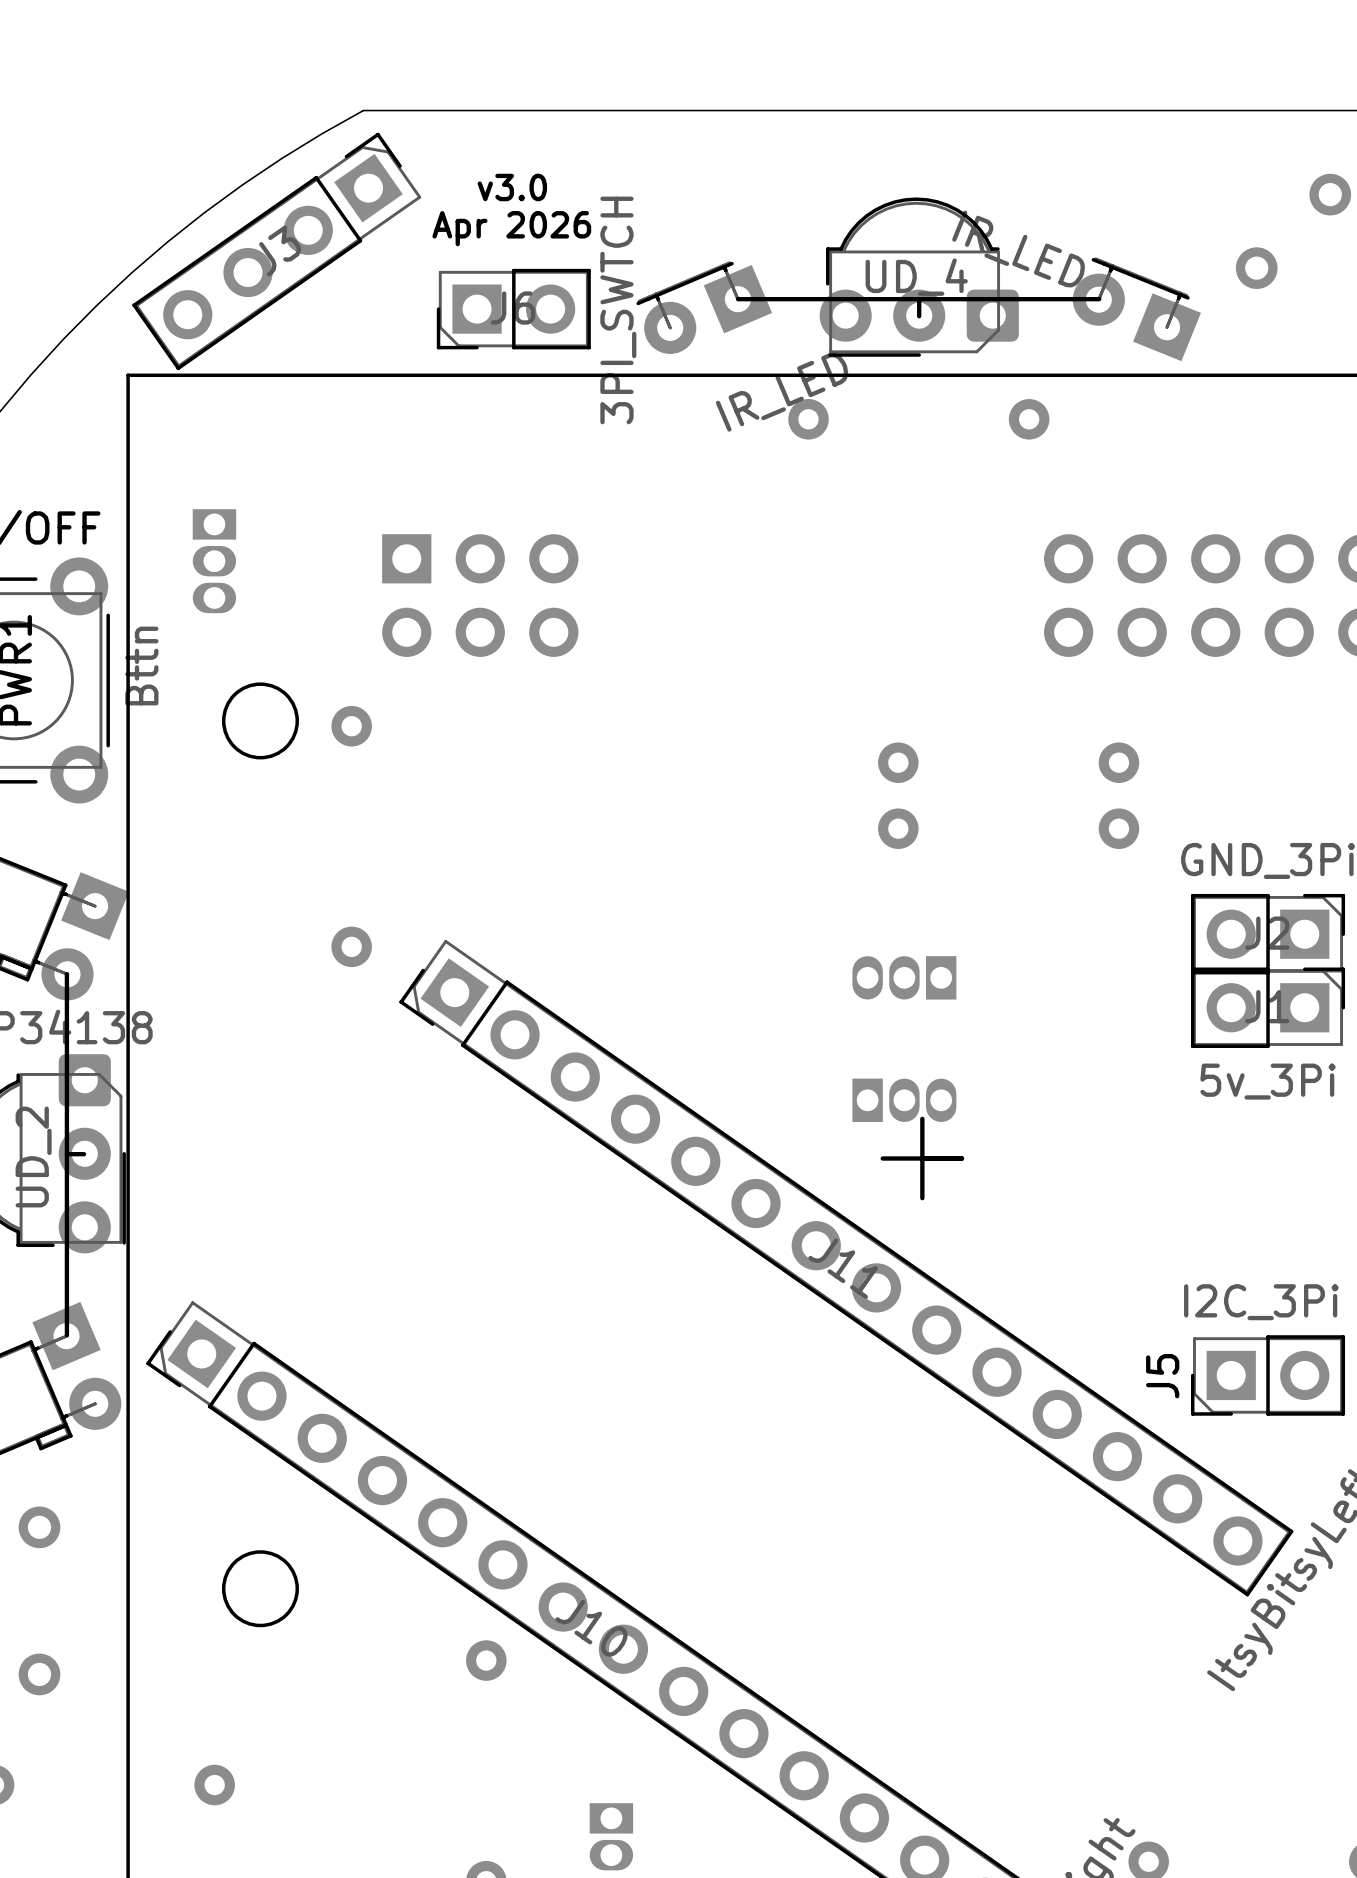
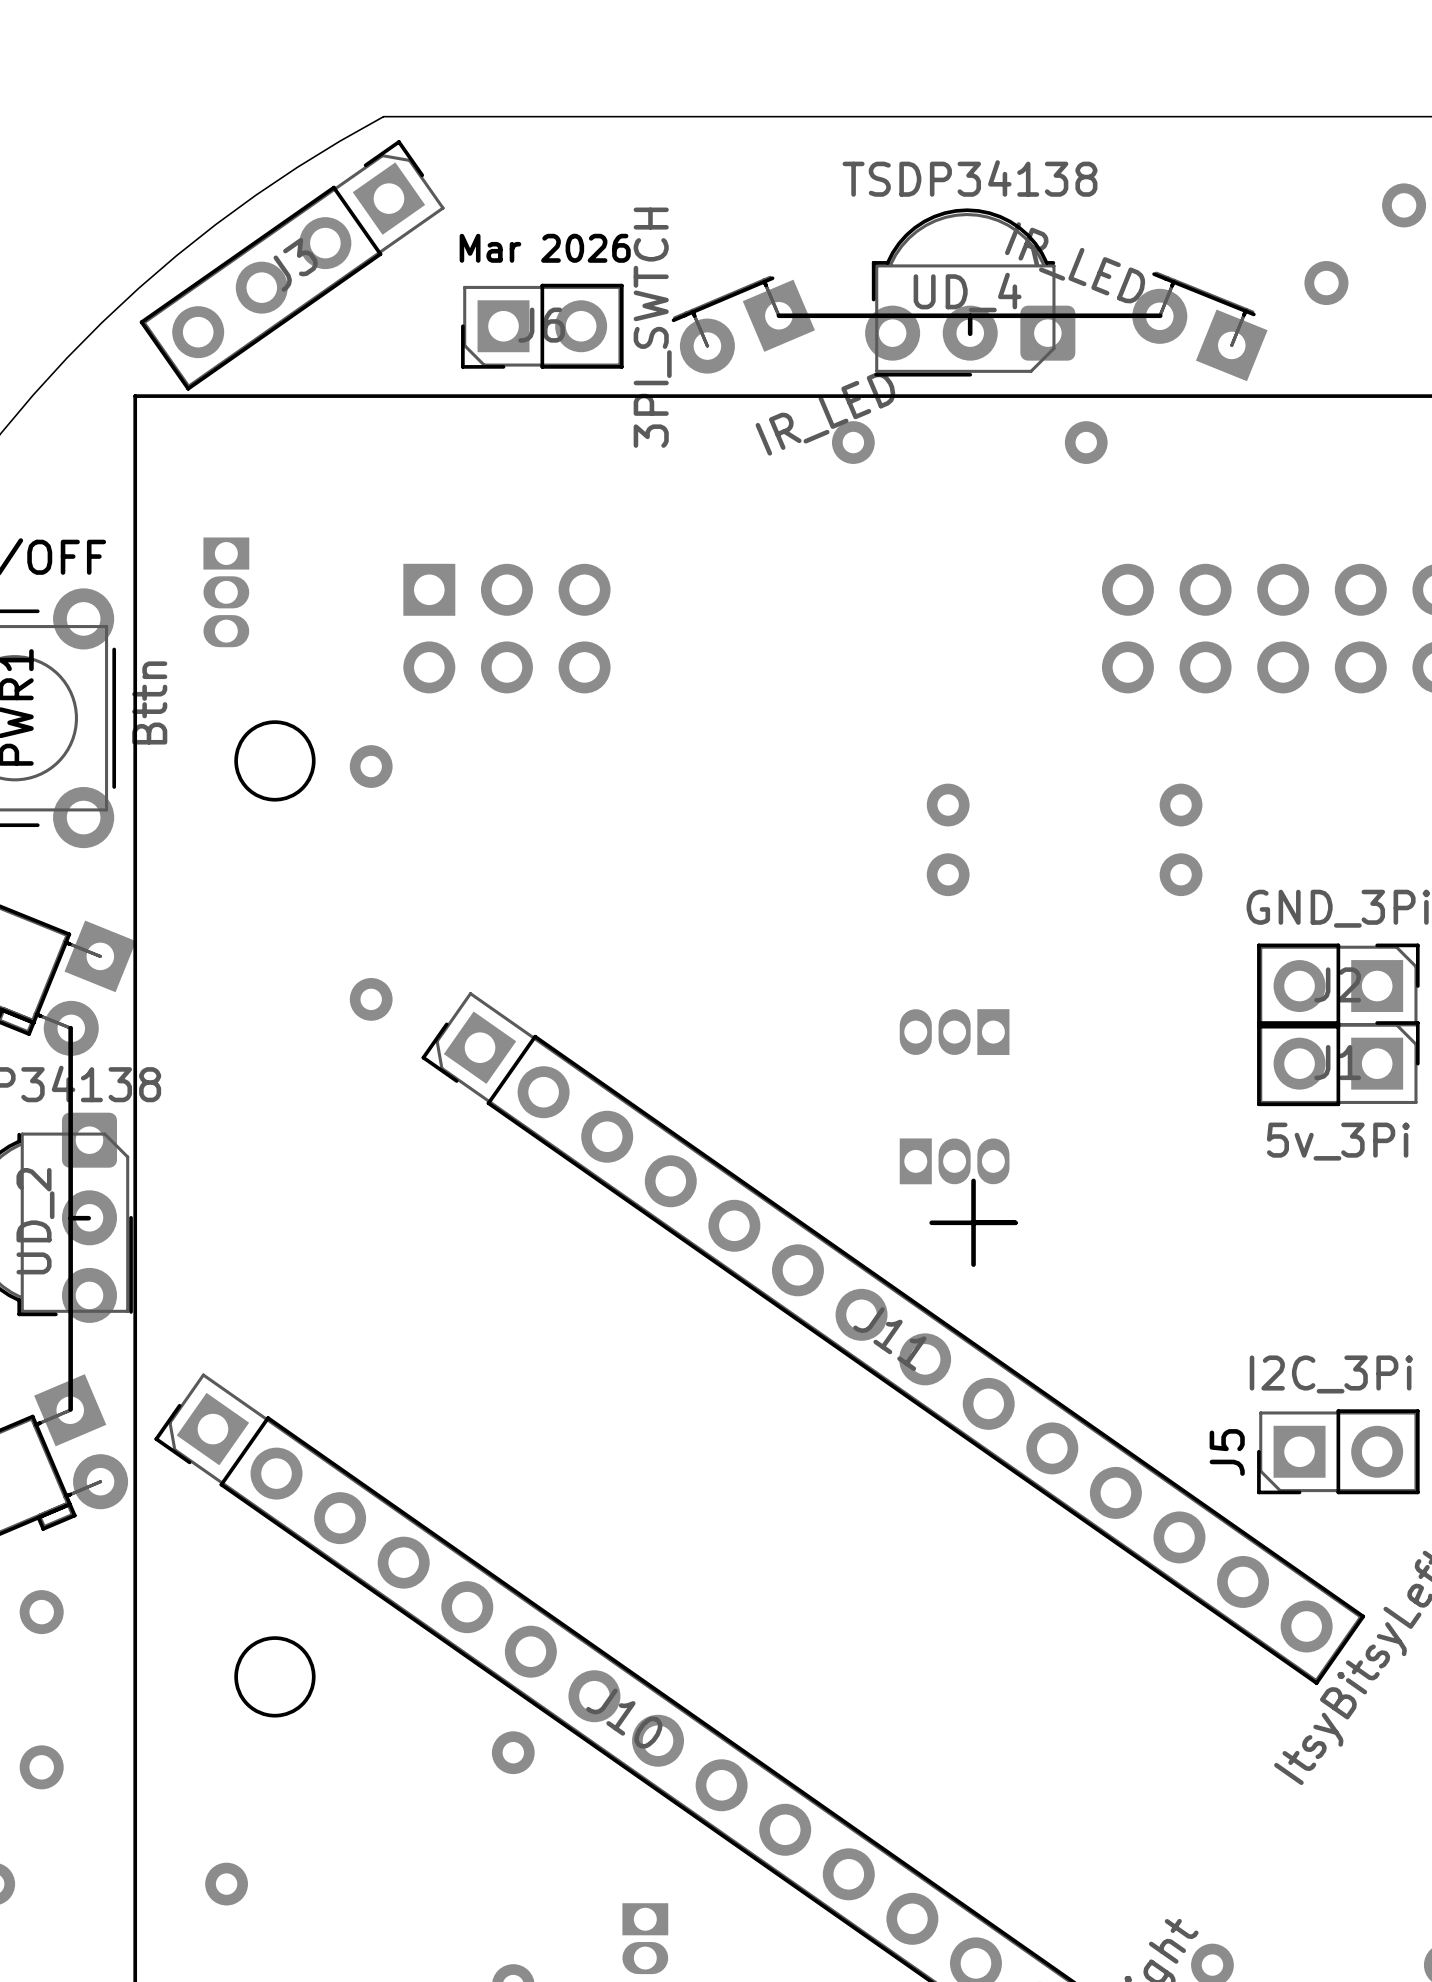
UD_4 value: none -> TSDP34138 (970, 178)
text: v3.0 (512, 187) -> none
text: Apr 2026 (511, 228) -> Mar 2026 (545, 248)

